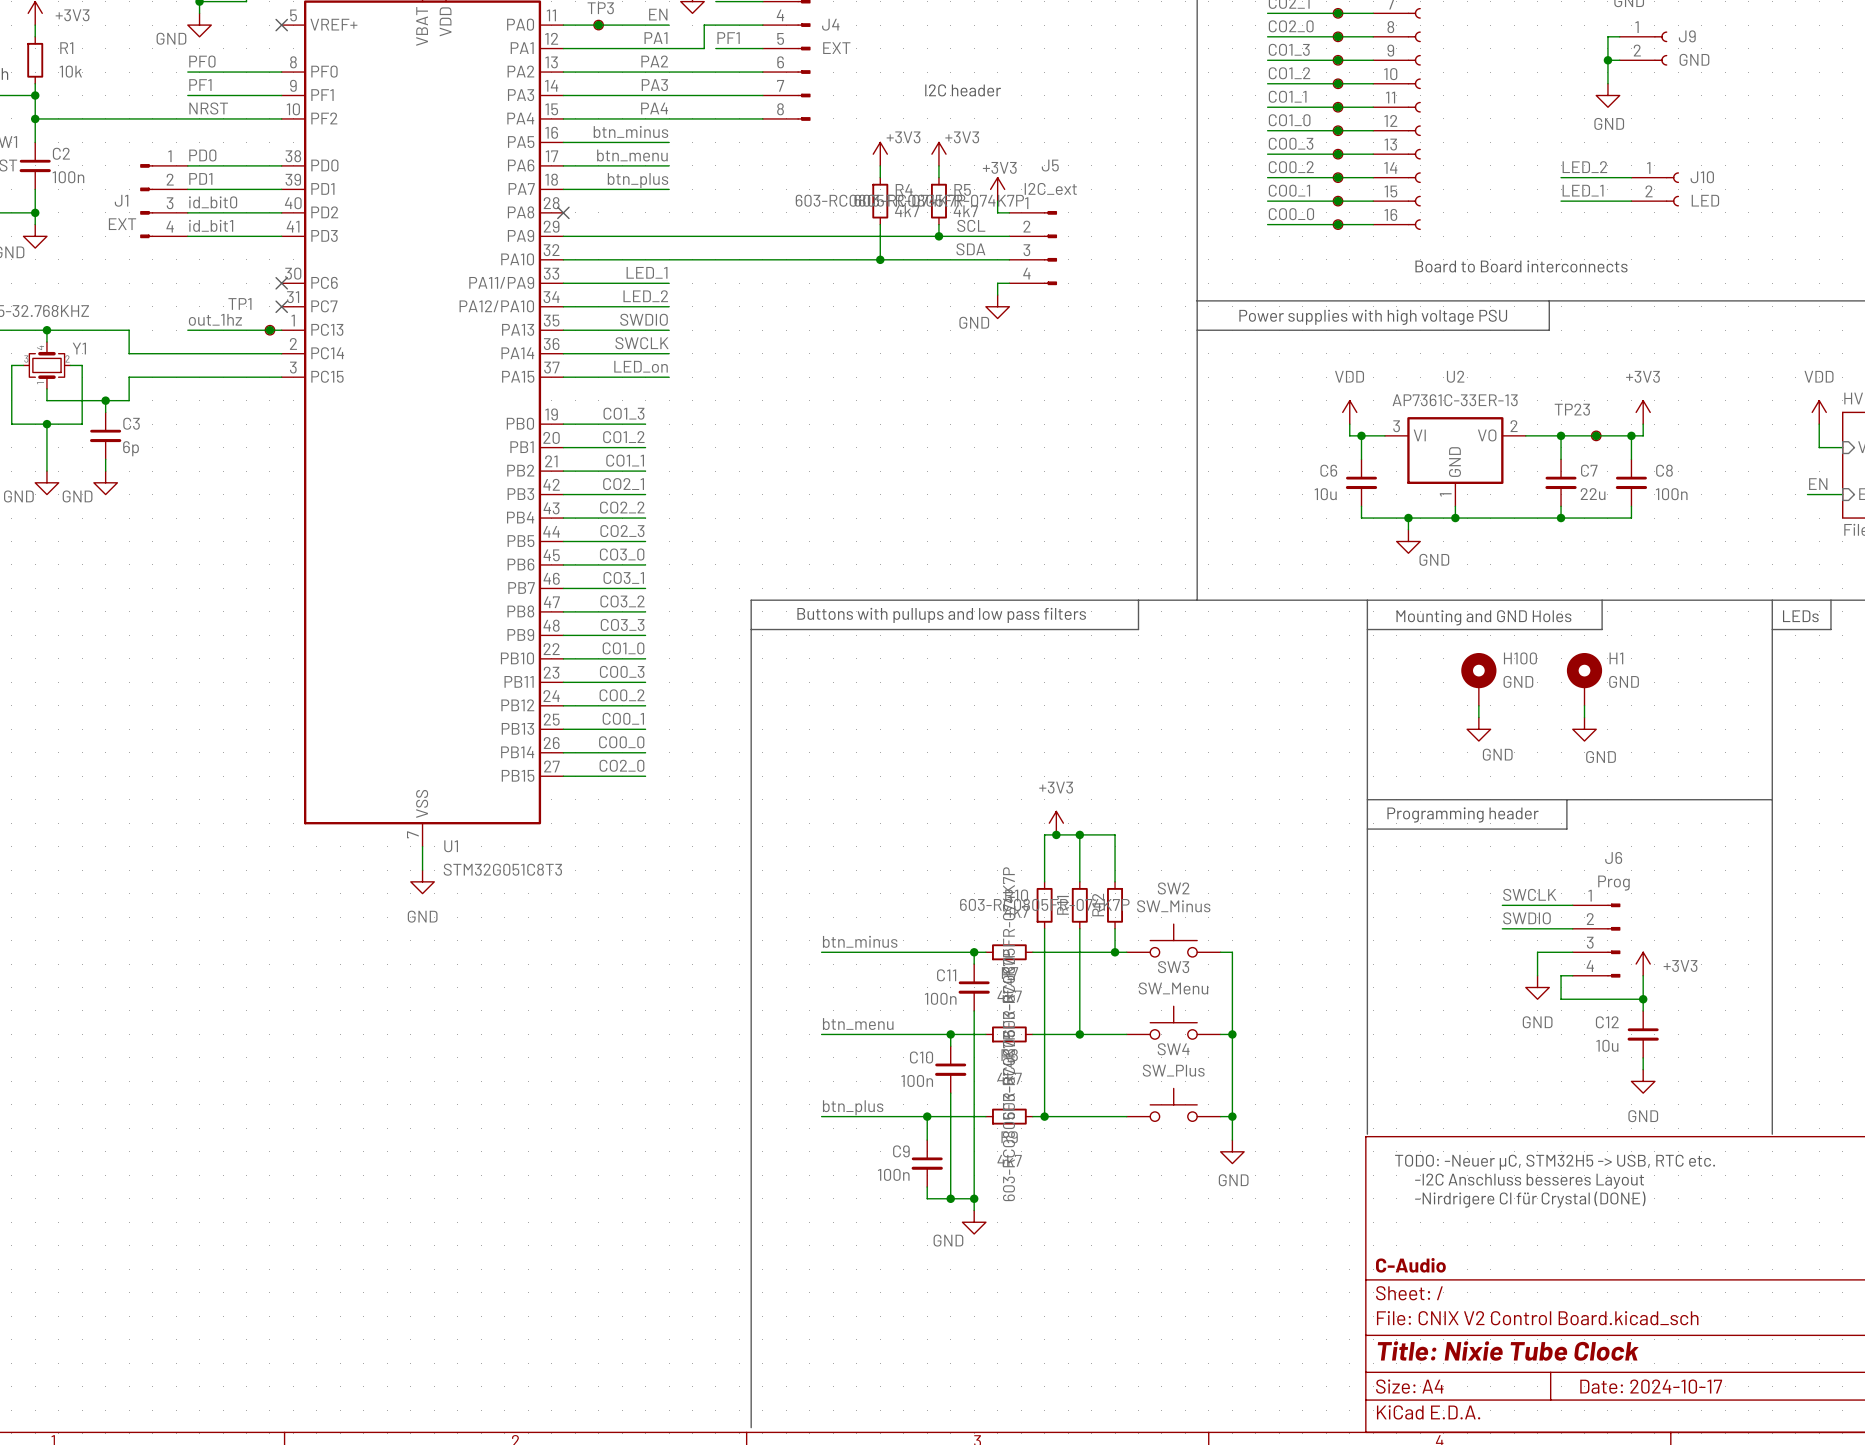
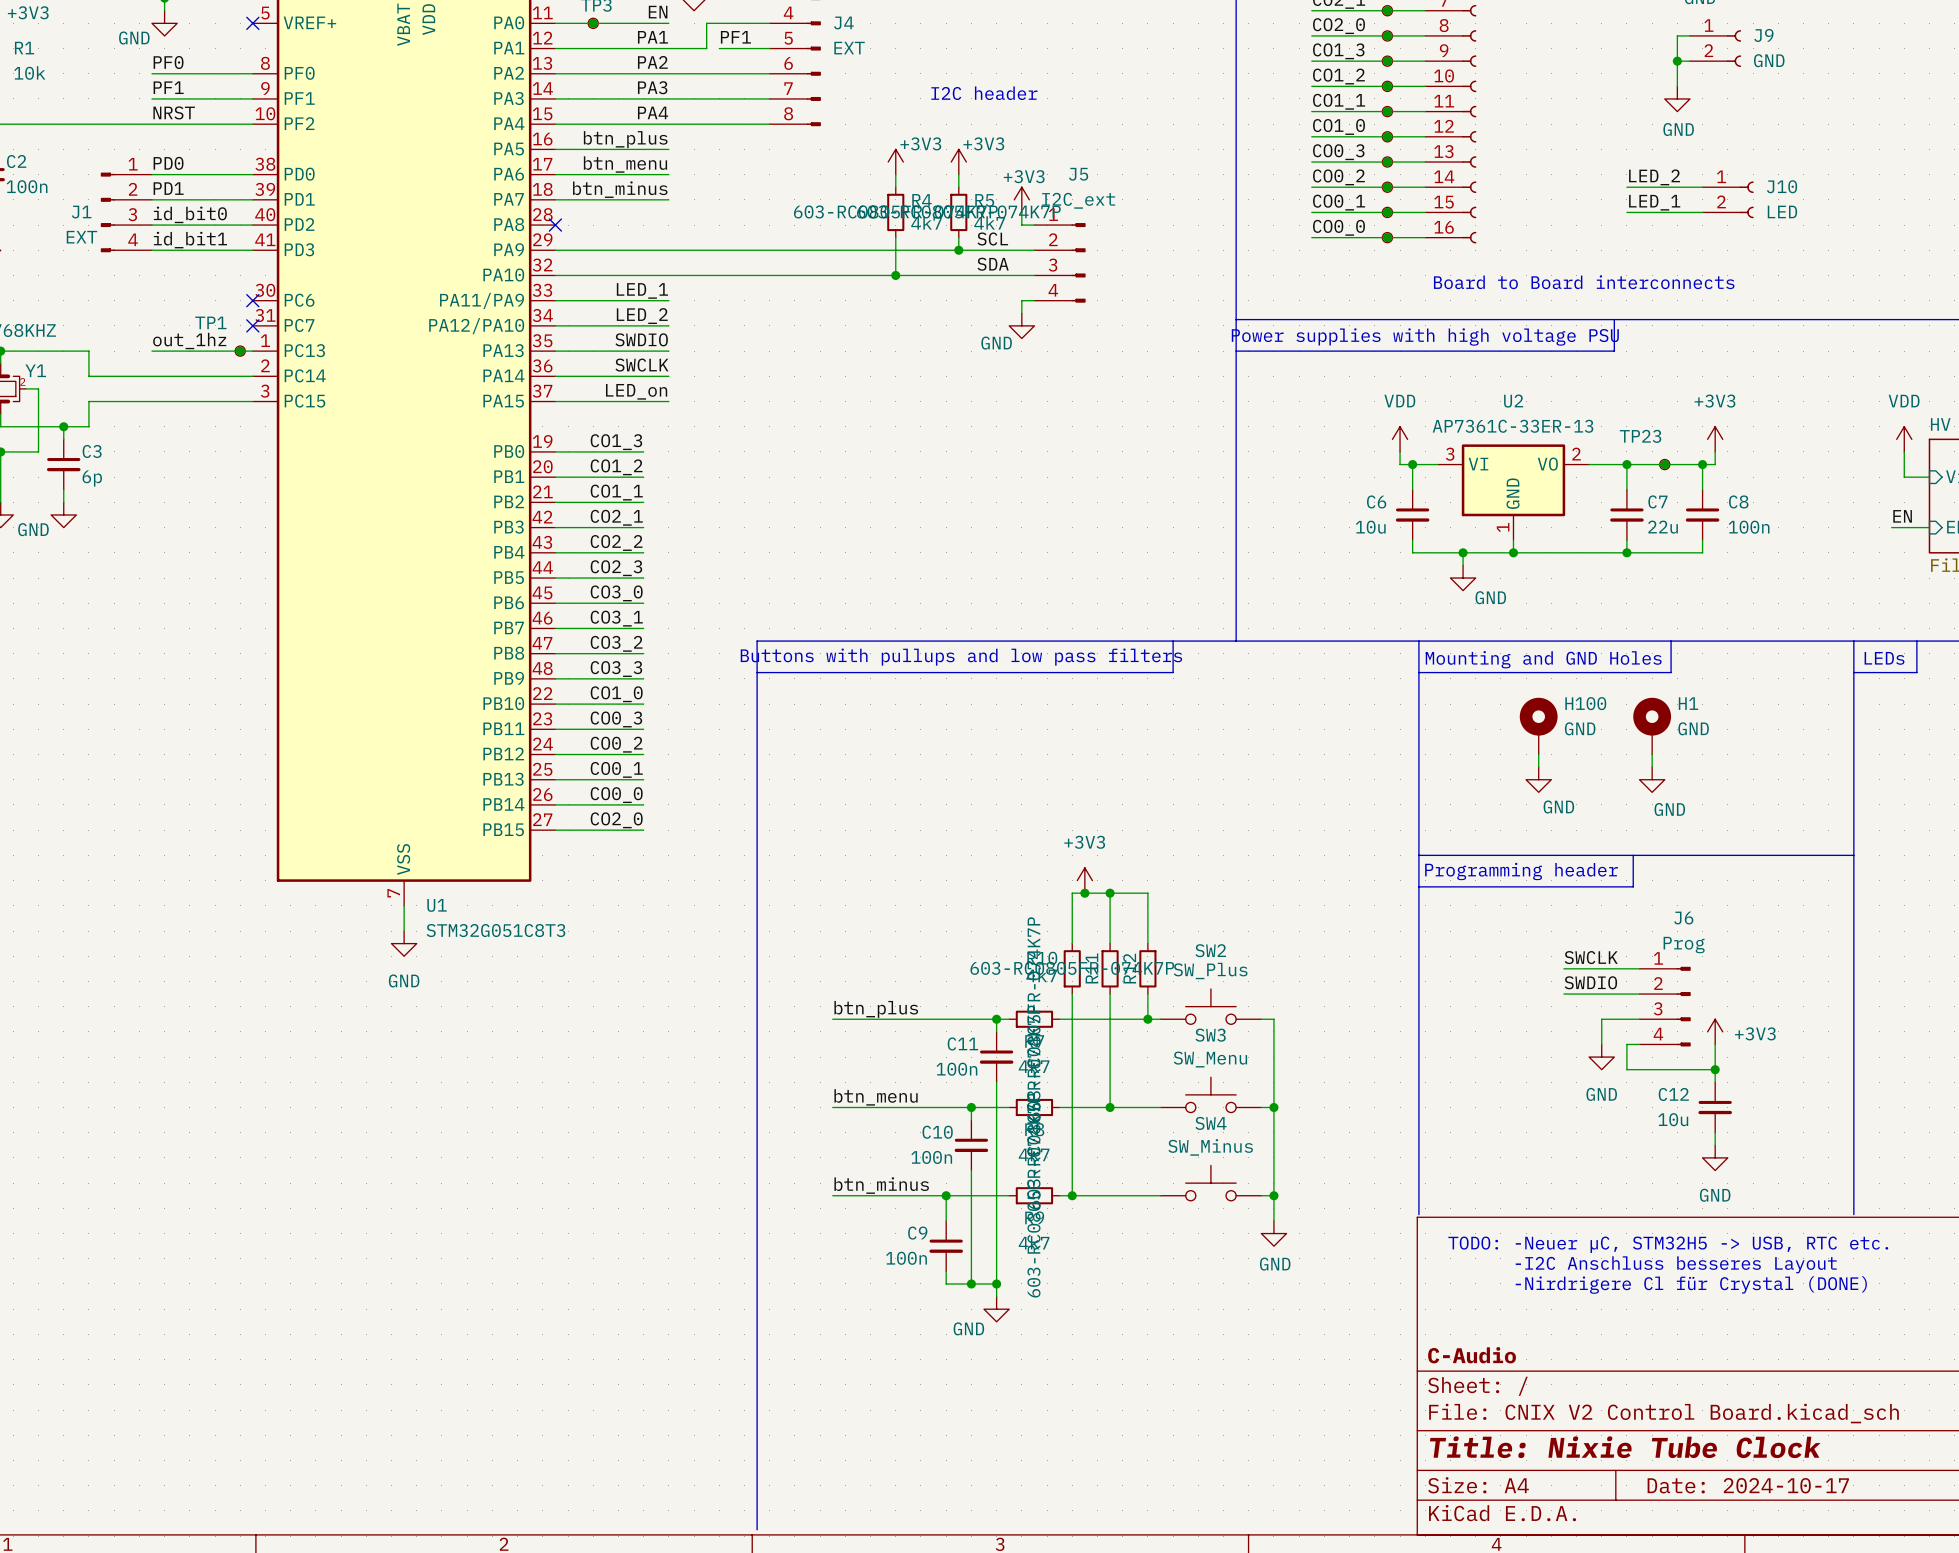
label: btn_minus (630, 131) -> btn_plus (625, 139)
label: btn_plus (637, 180) -> btn_minus (620, 189)
SW2 value: SW_Minus (1173, 906) -> SW_Plus (1210, 971)
label: btn_minus (860, 941) -> btn_plus (876, 1009)
SW4 value: SW_Plus (1173, 1070) -> SW_Minus (1210, 1147)
label: btn_plus (853, 1107) -> btn_minus (881, 1185)

